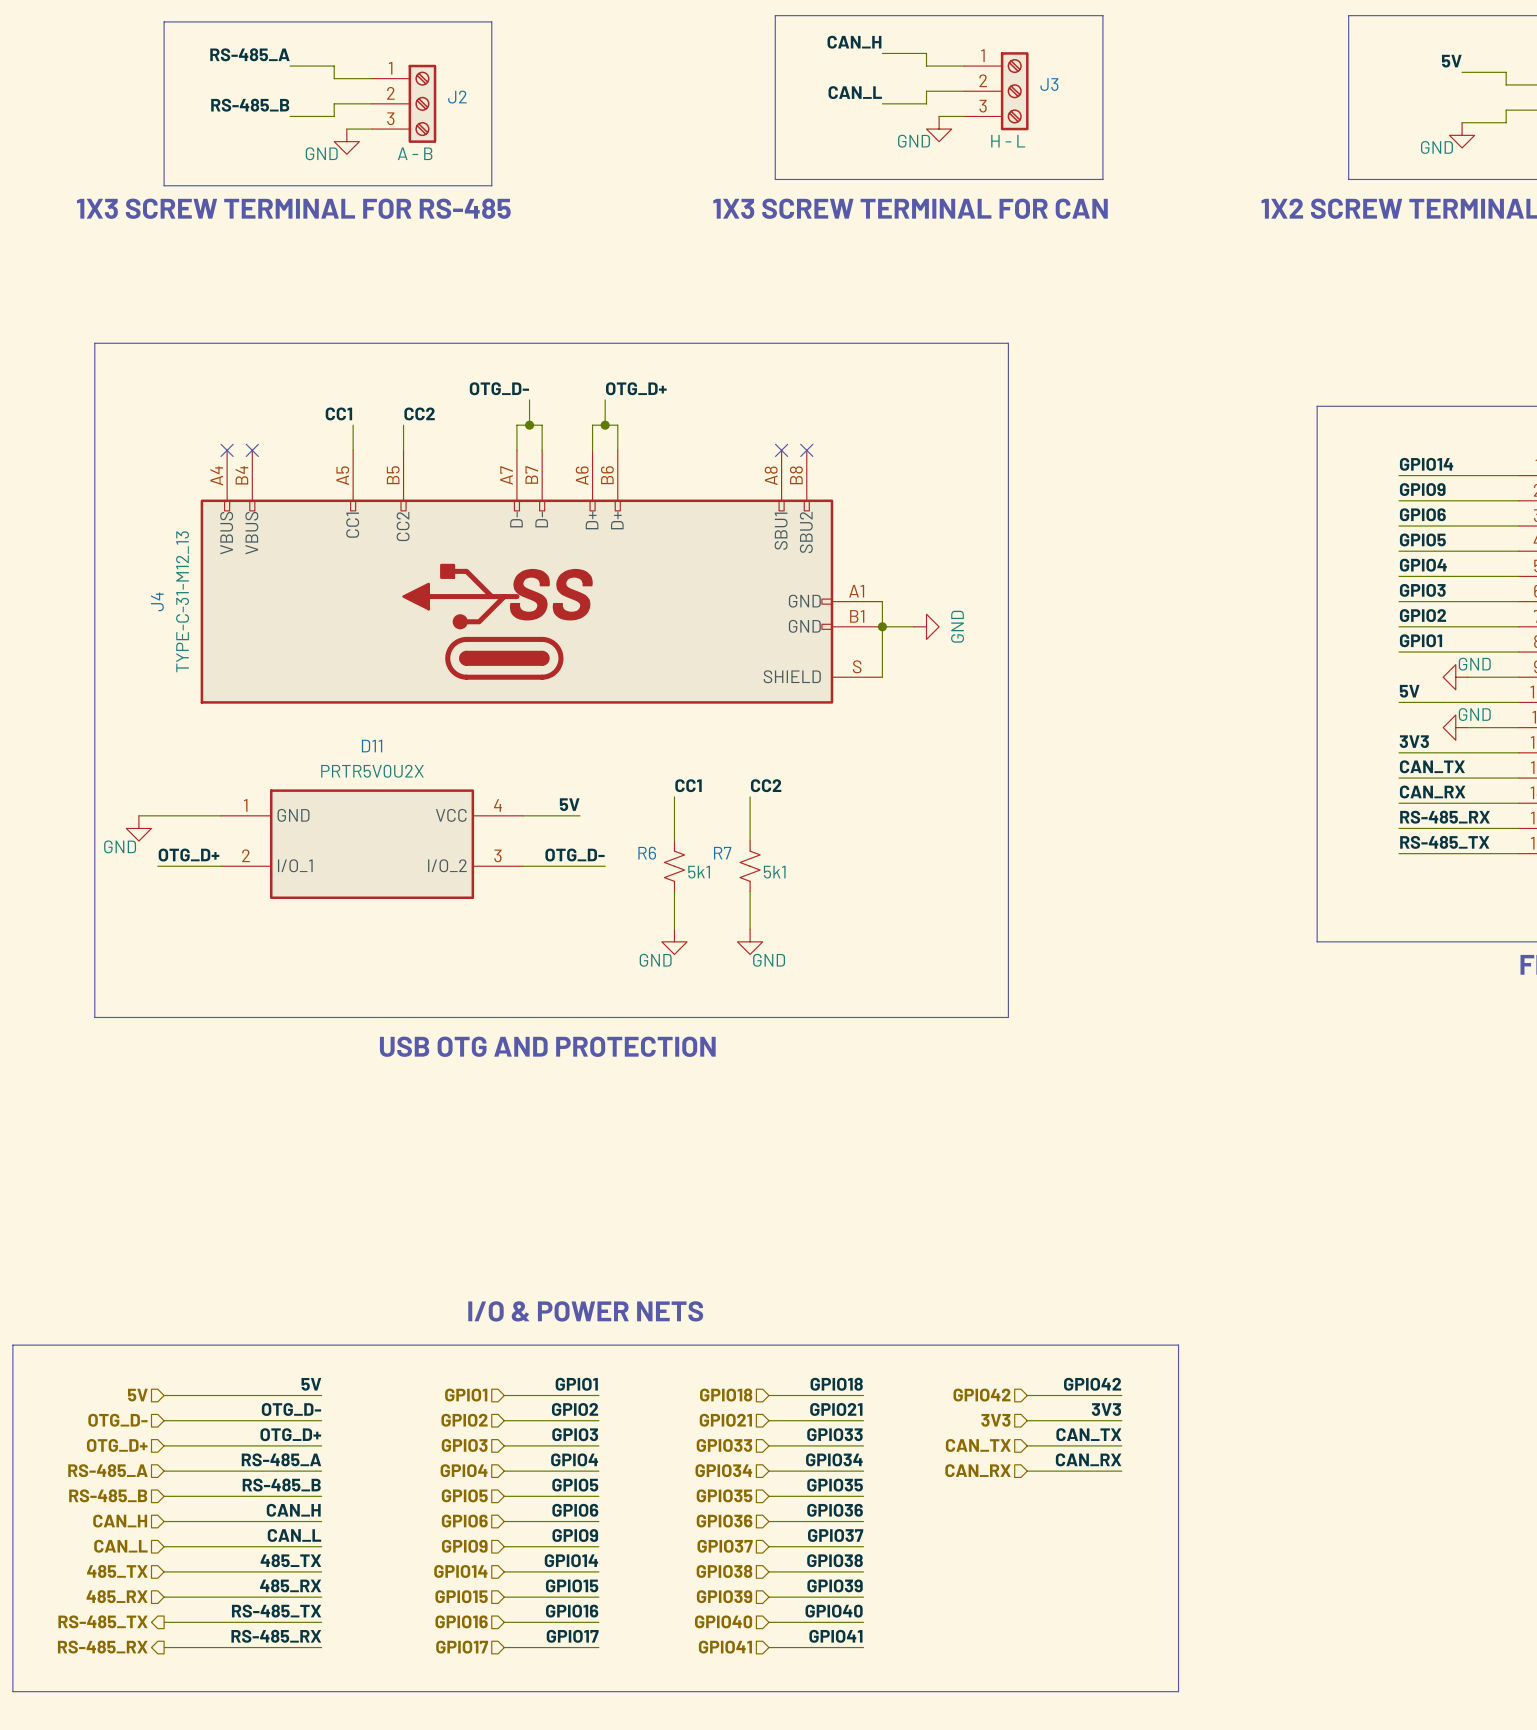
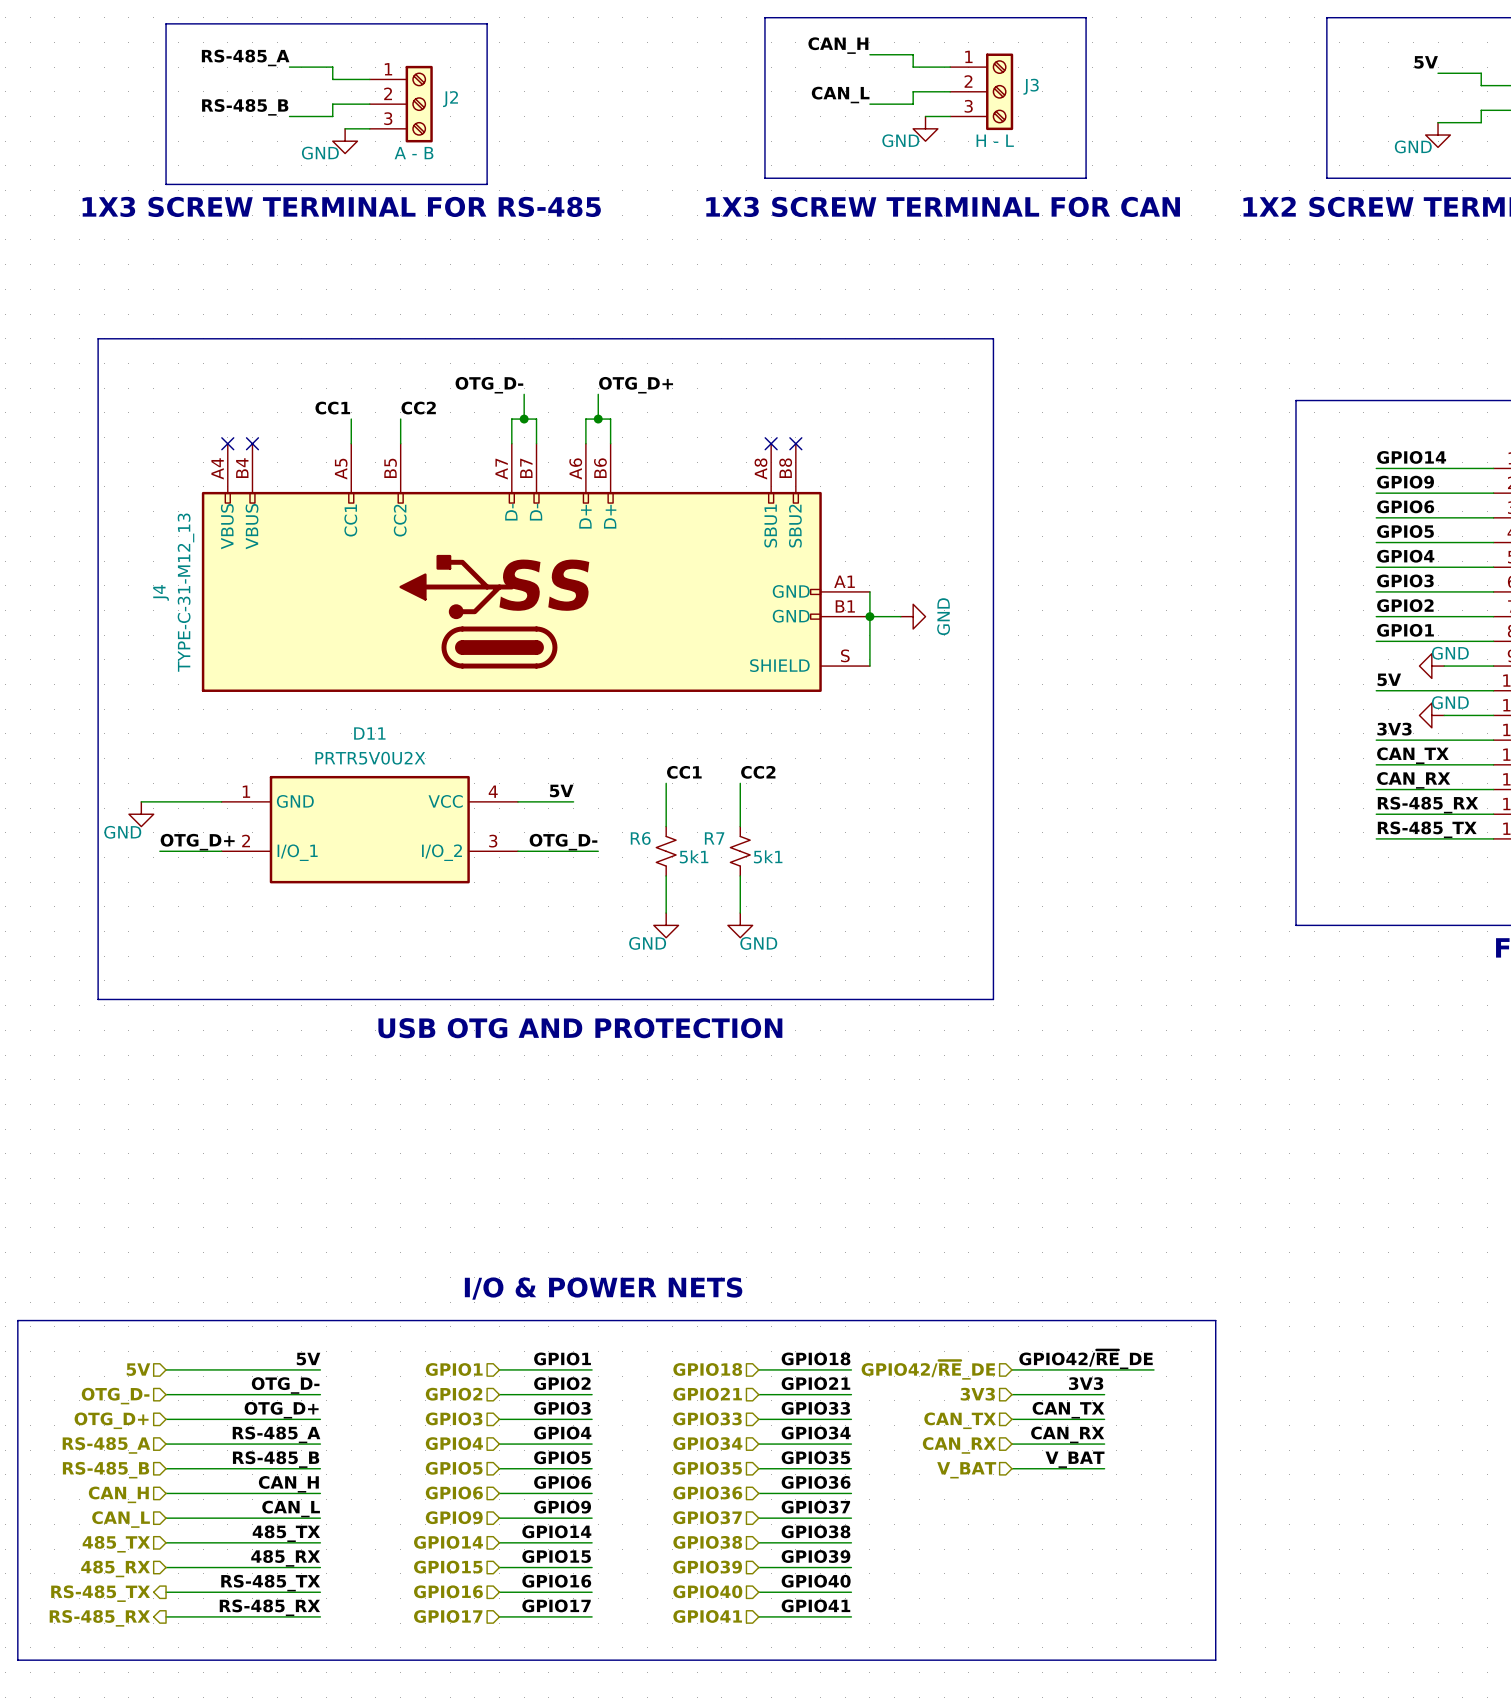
bus: (1178, 1345) (1178, 1691) -> (1160, 1320) (1215, 1320) (1215, 1660) (1160, 1660)
label: none -> GPIO42/~{RE}_DE (1086, 1359)
label: GPIO42 (1092, 1384) -> none
hierarchical label: GPIO42 (982, 1395) -> GPIO42/~{RE}_DE (928, 1370)
wire: none -> (1104, 1369) (1153, 1369)
label: none -> V_BAT (1075, 1459)
hierarchical label: none -> V_BAT (966, 1470)
wire: none -> (1011, 1468) (1104, 1468)

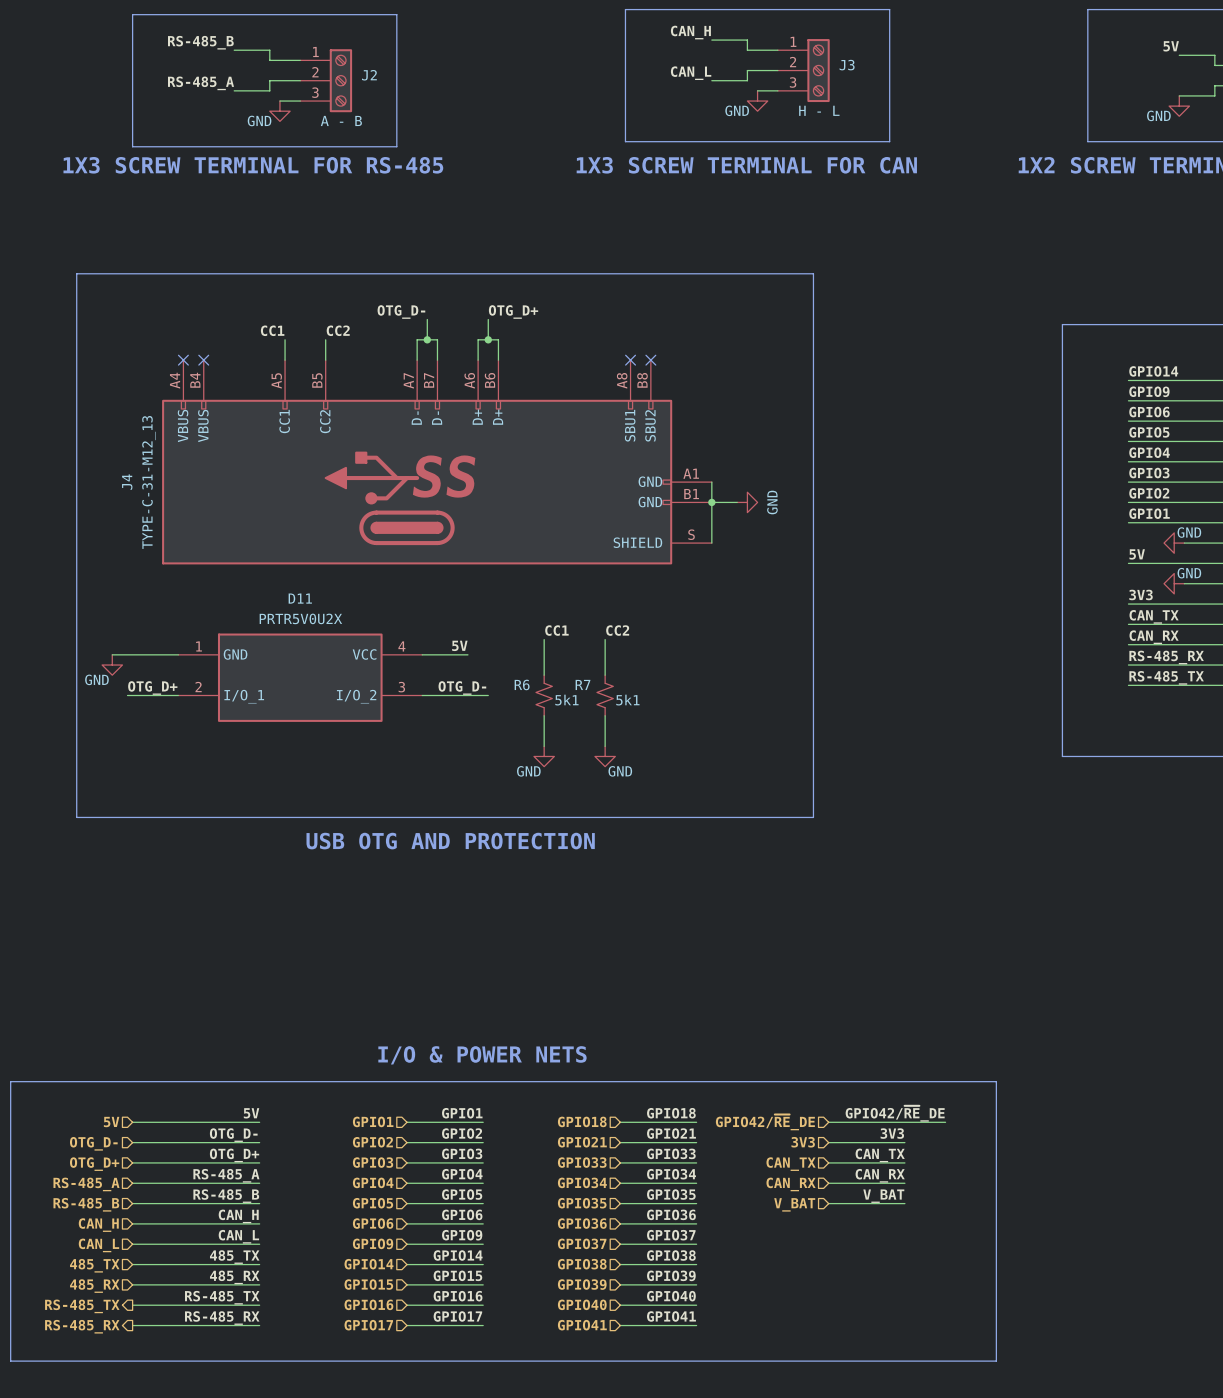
label: RS-485_A (245, 57) -> RS-485_B (200, 42)
label: RS-485_B (245, 107) -> RS-485_A (201, 83)

